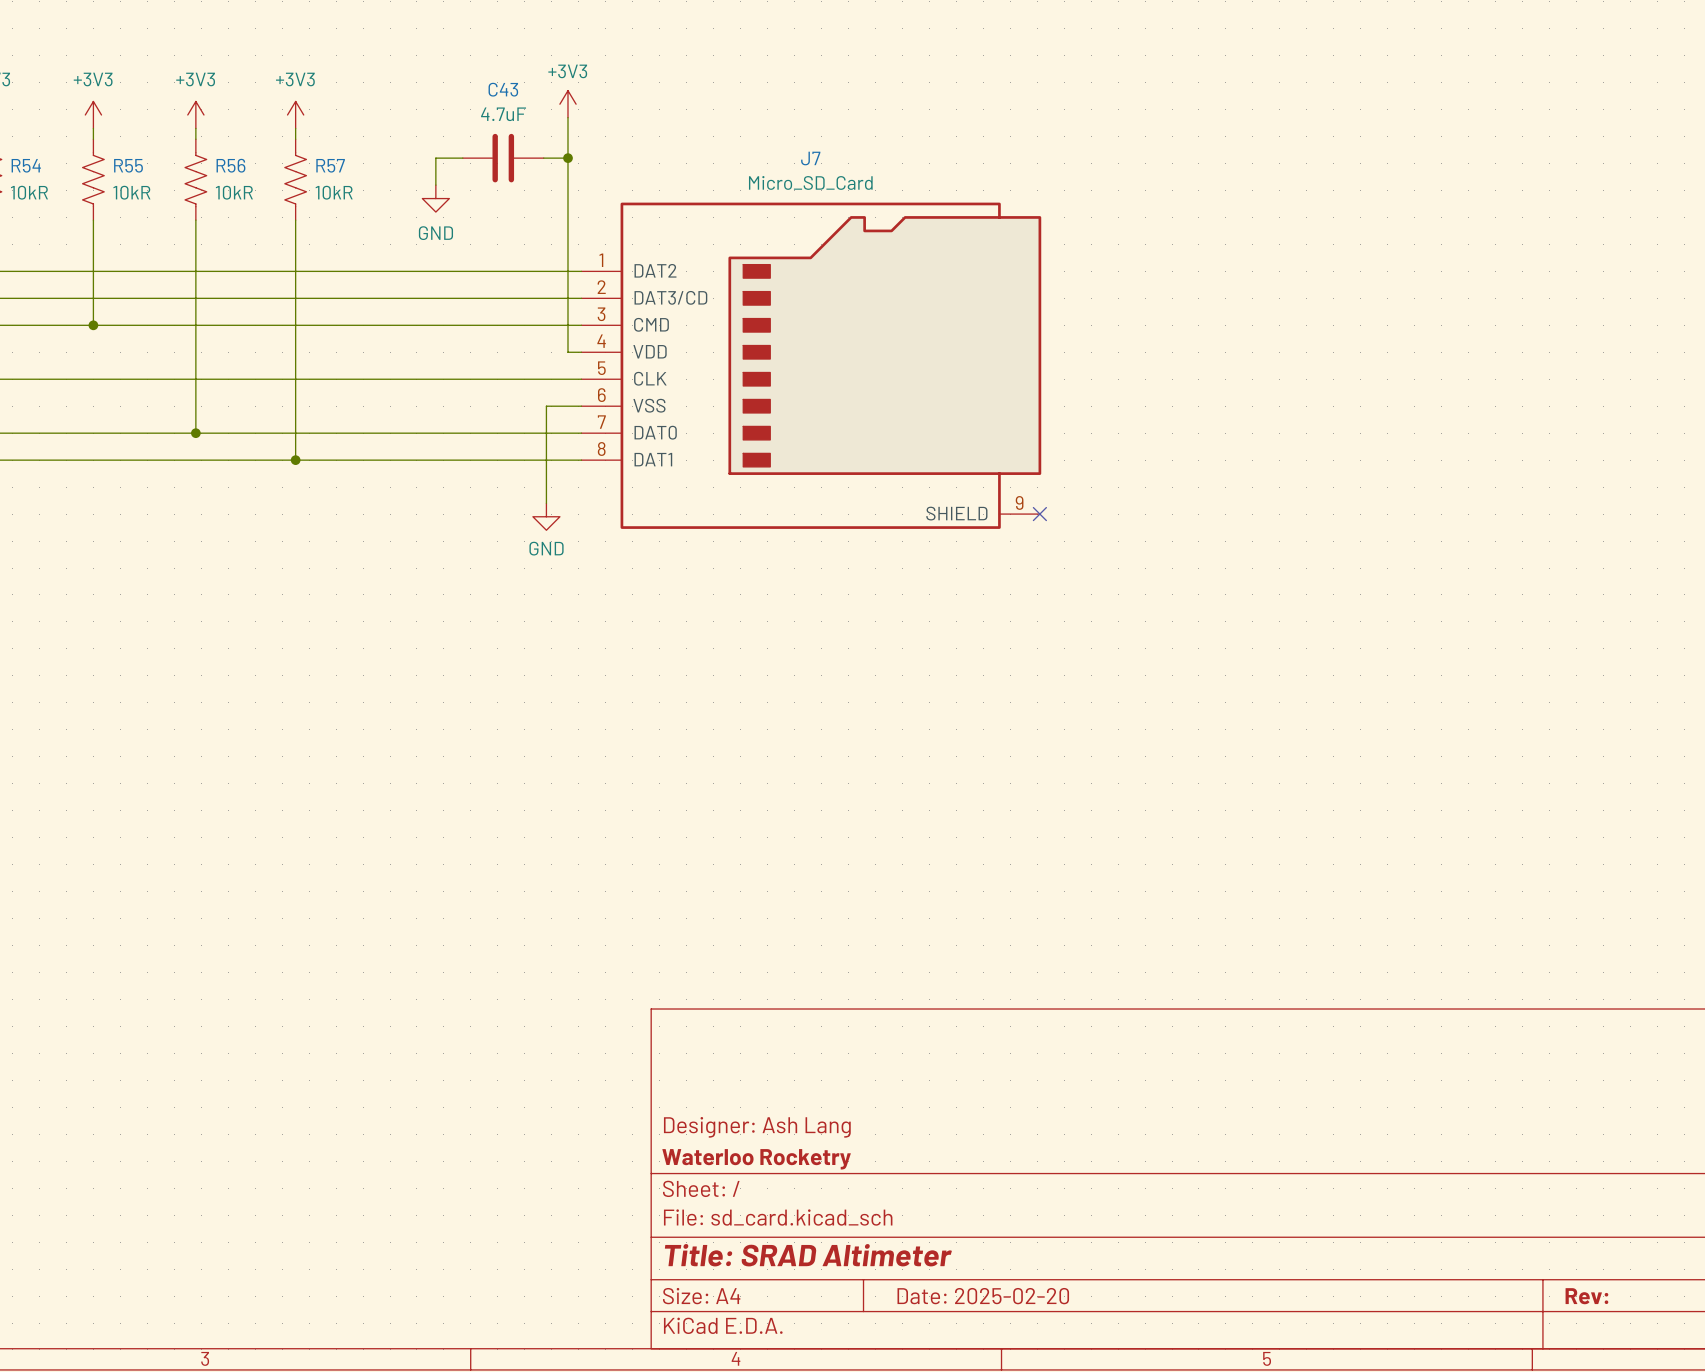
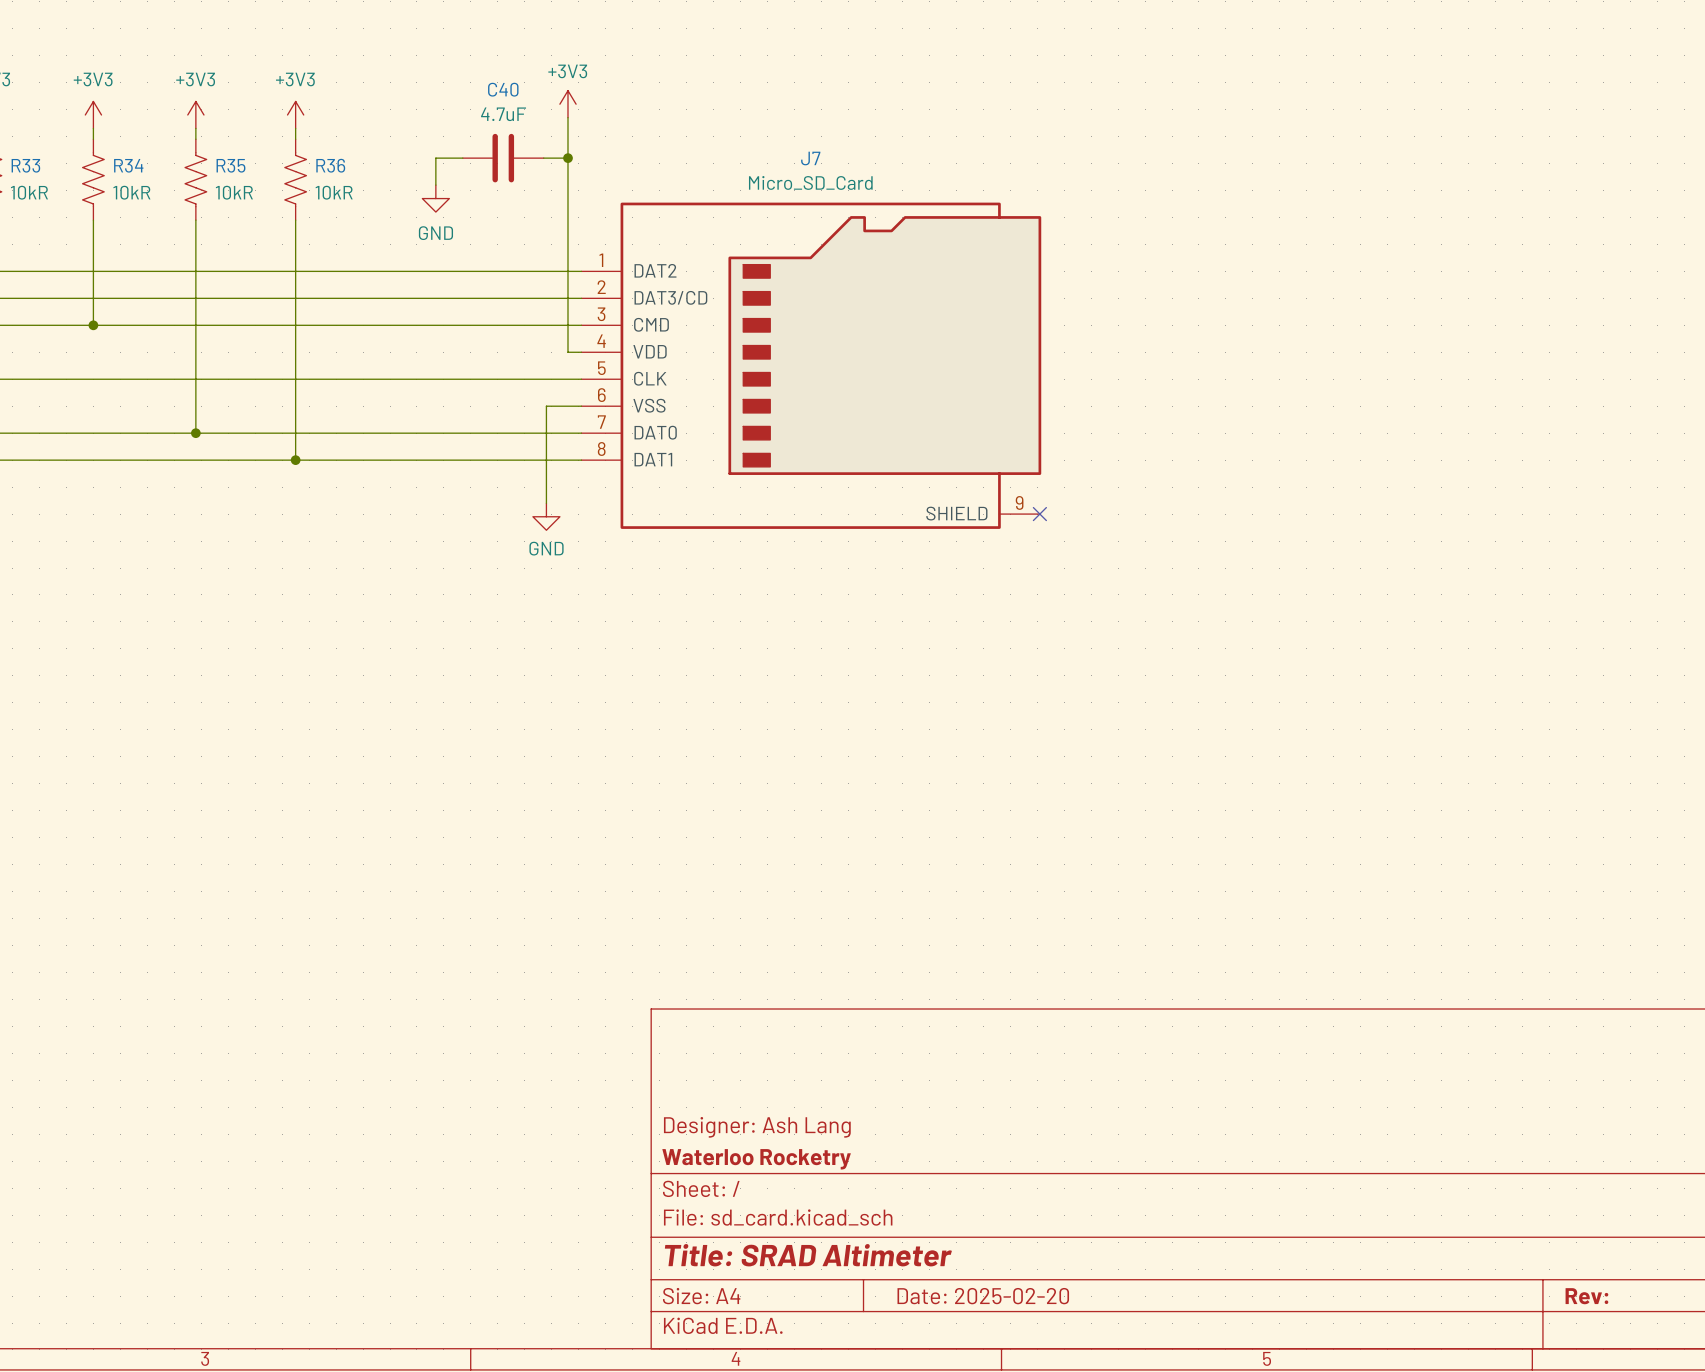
C43 name: C43 (503, 89) -> C40 (503, 89)
R54 name: R54 (26, 165) -> R33 (25, 165)
R55 name: R55 (128, 165) -> R34 (128, 165)
R56 name: R56 (230, 165) -> R35 (230, 165)
R57 name: R57 (330, 165) -> R36 (330, 165)

